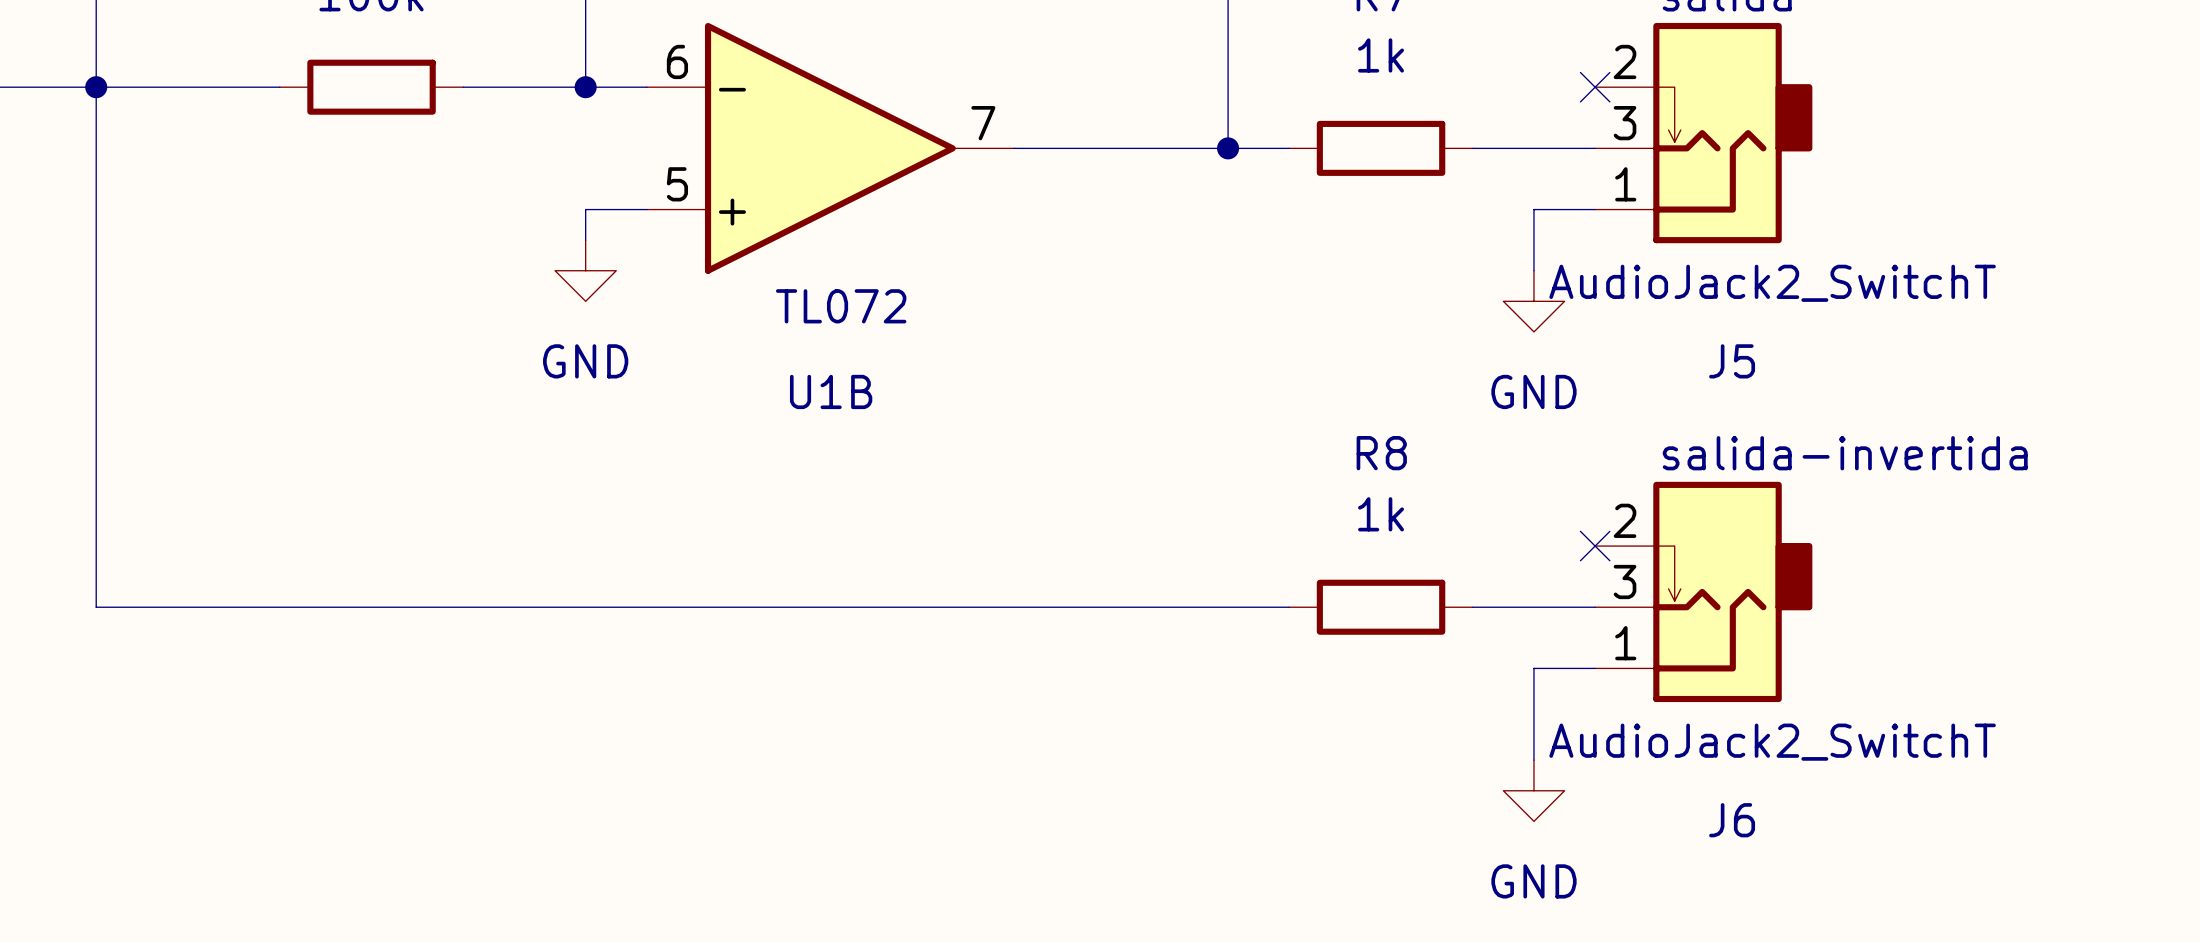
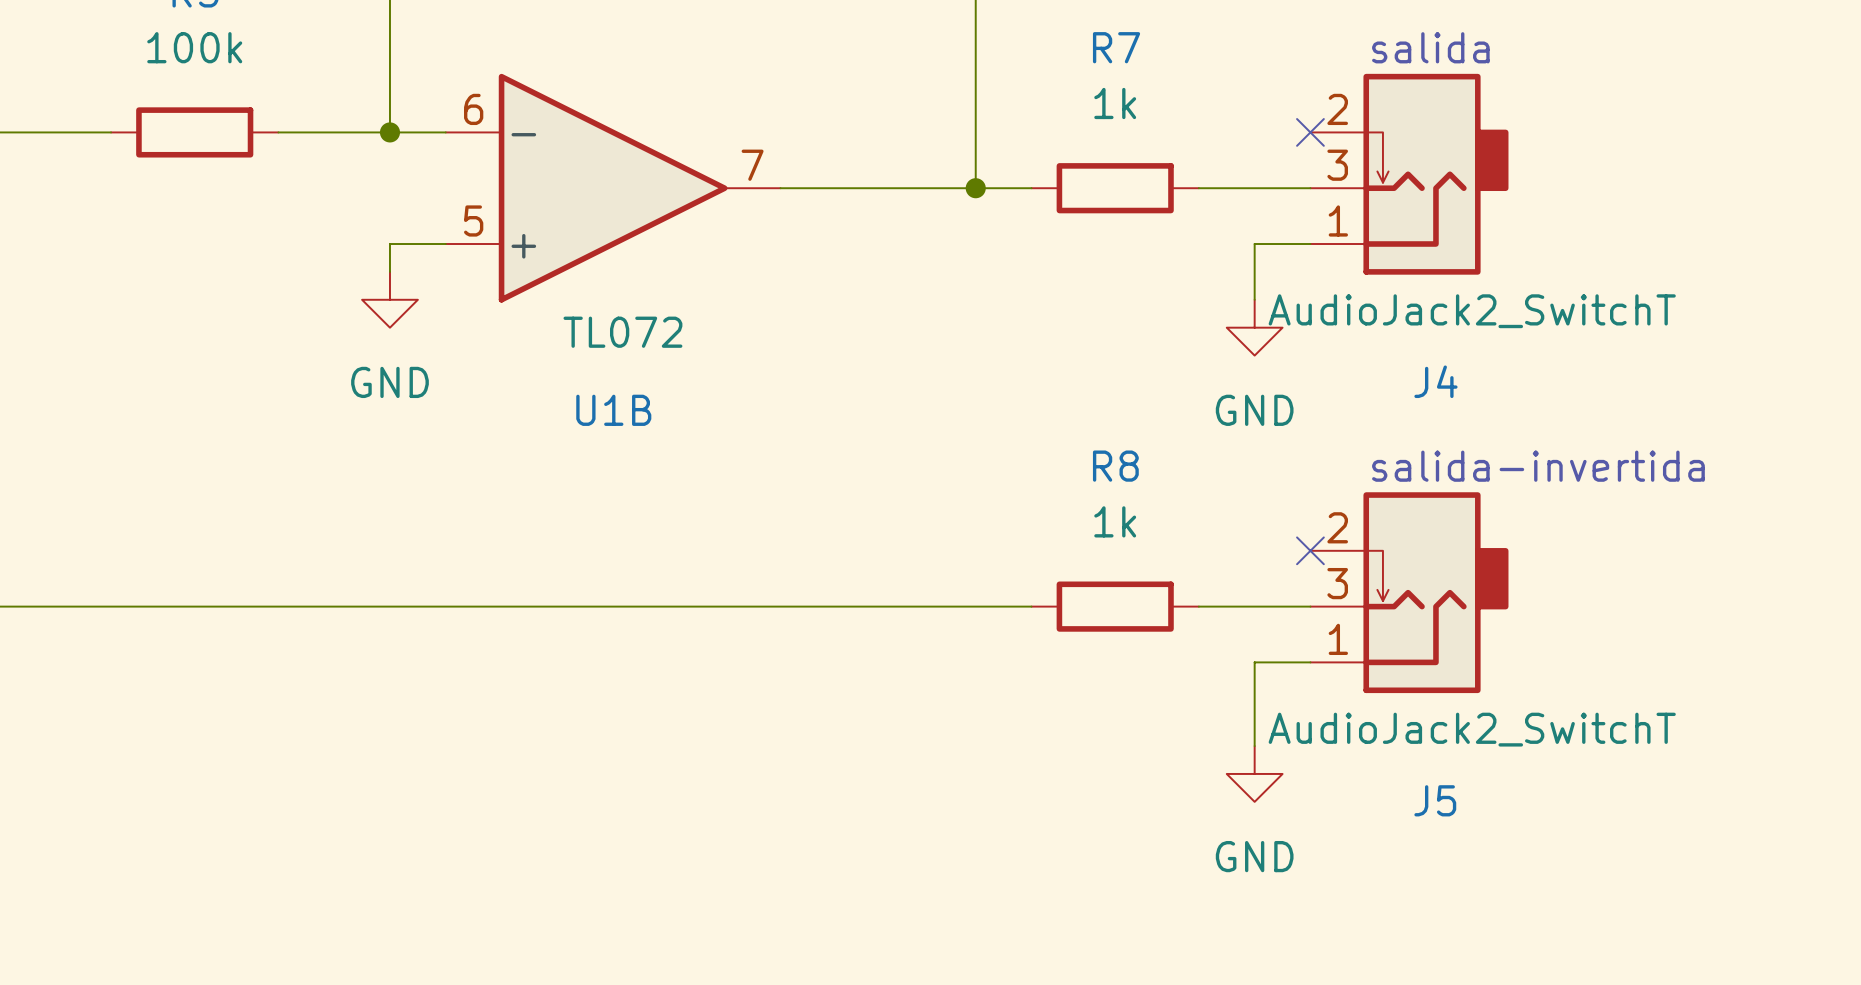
J5 name: J5 (1732, 361) -> J4 (1435, 381)
J6 name: J6 (1732, 820) -> J5 (1435, 800)

